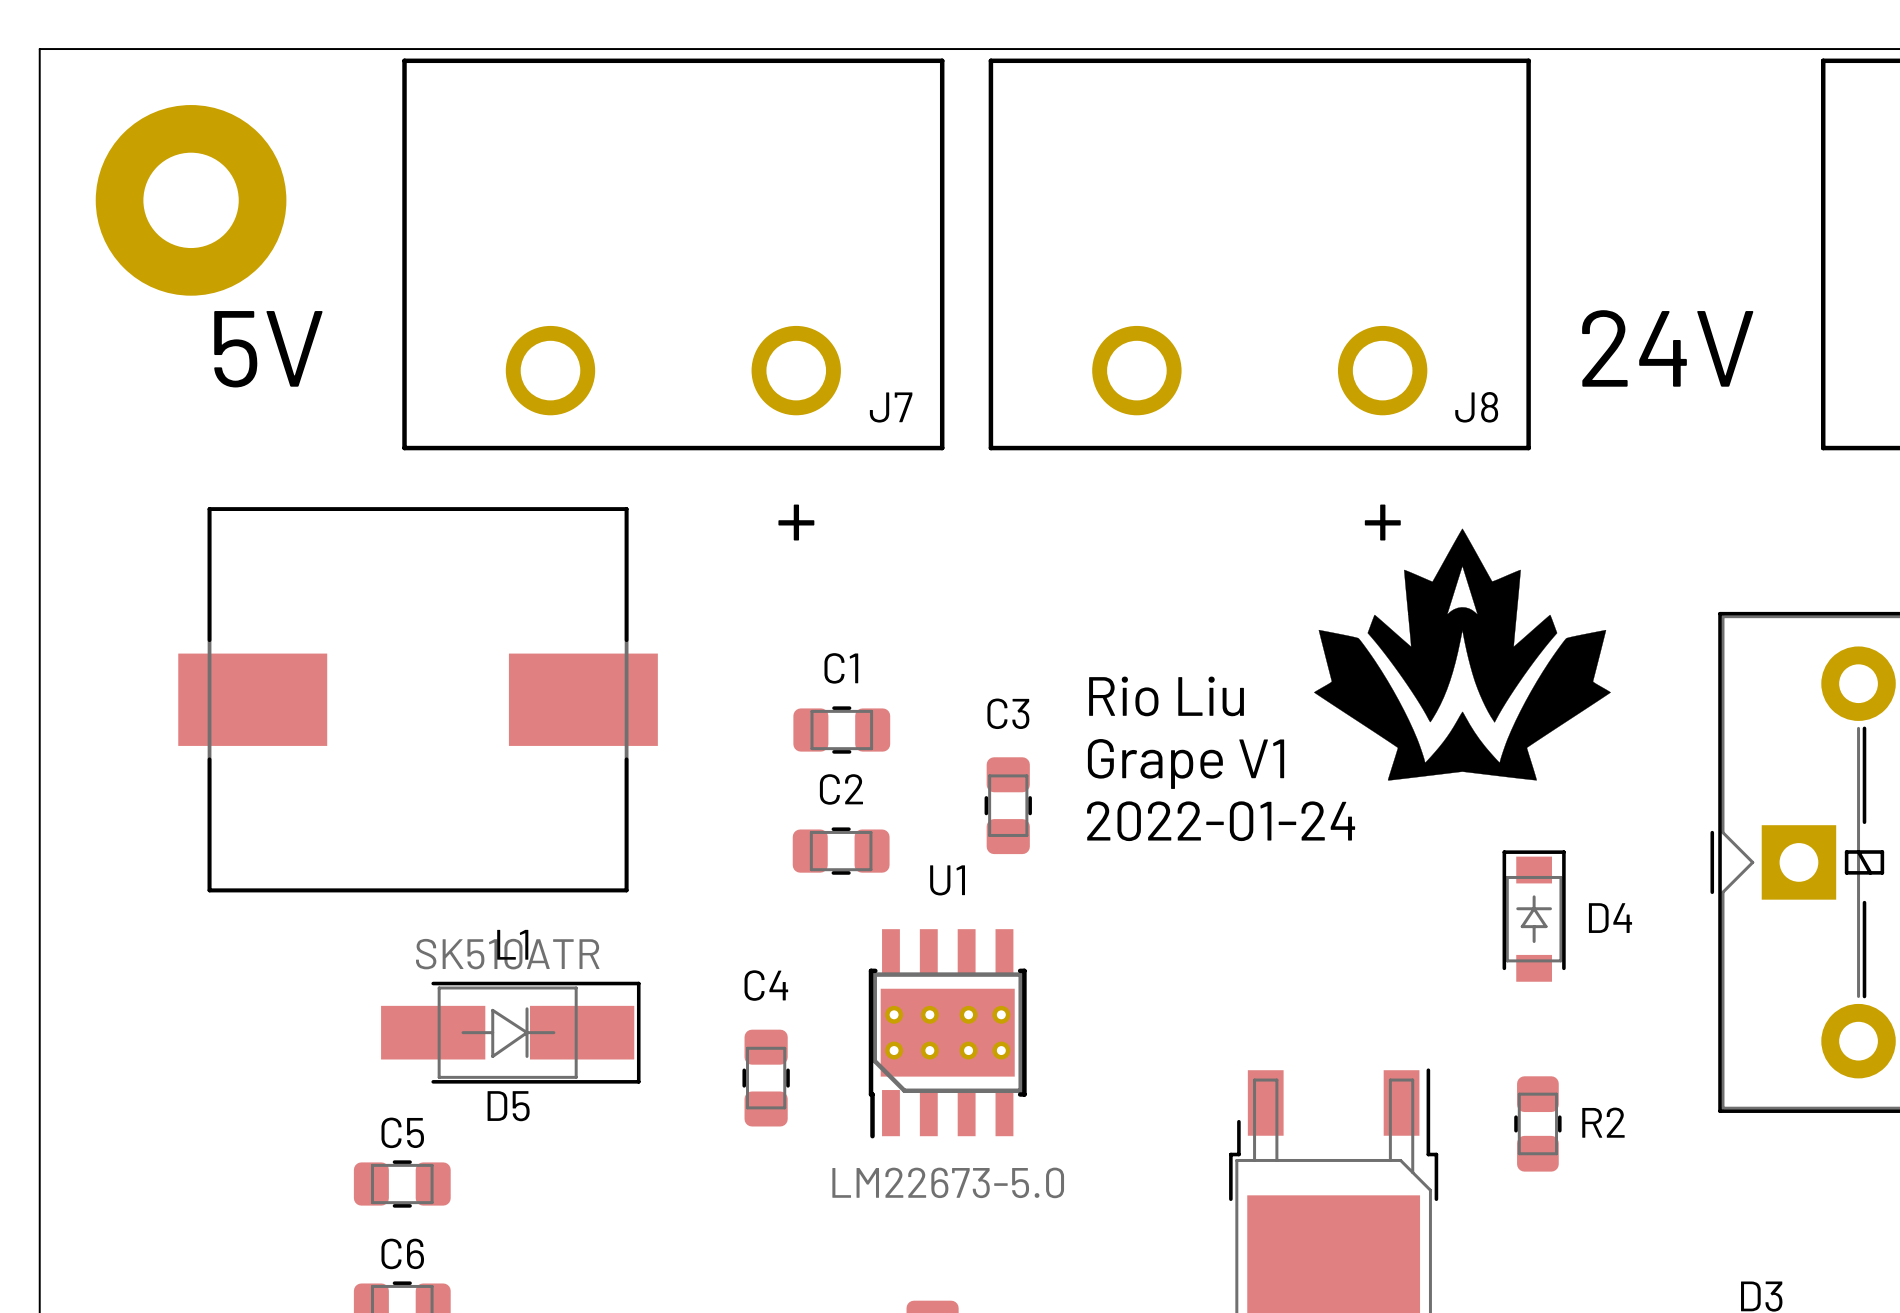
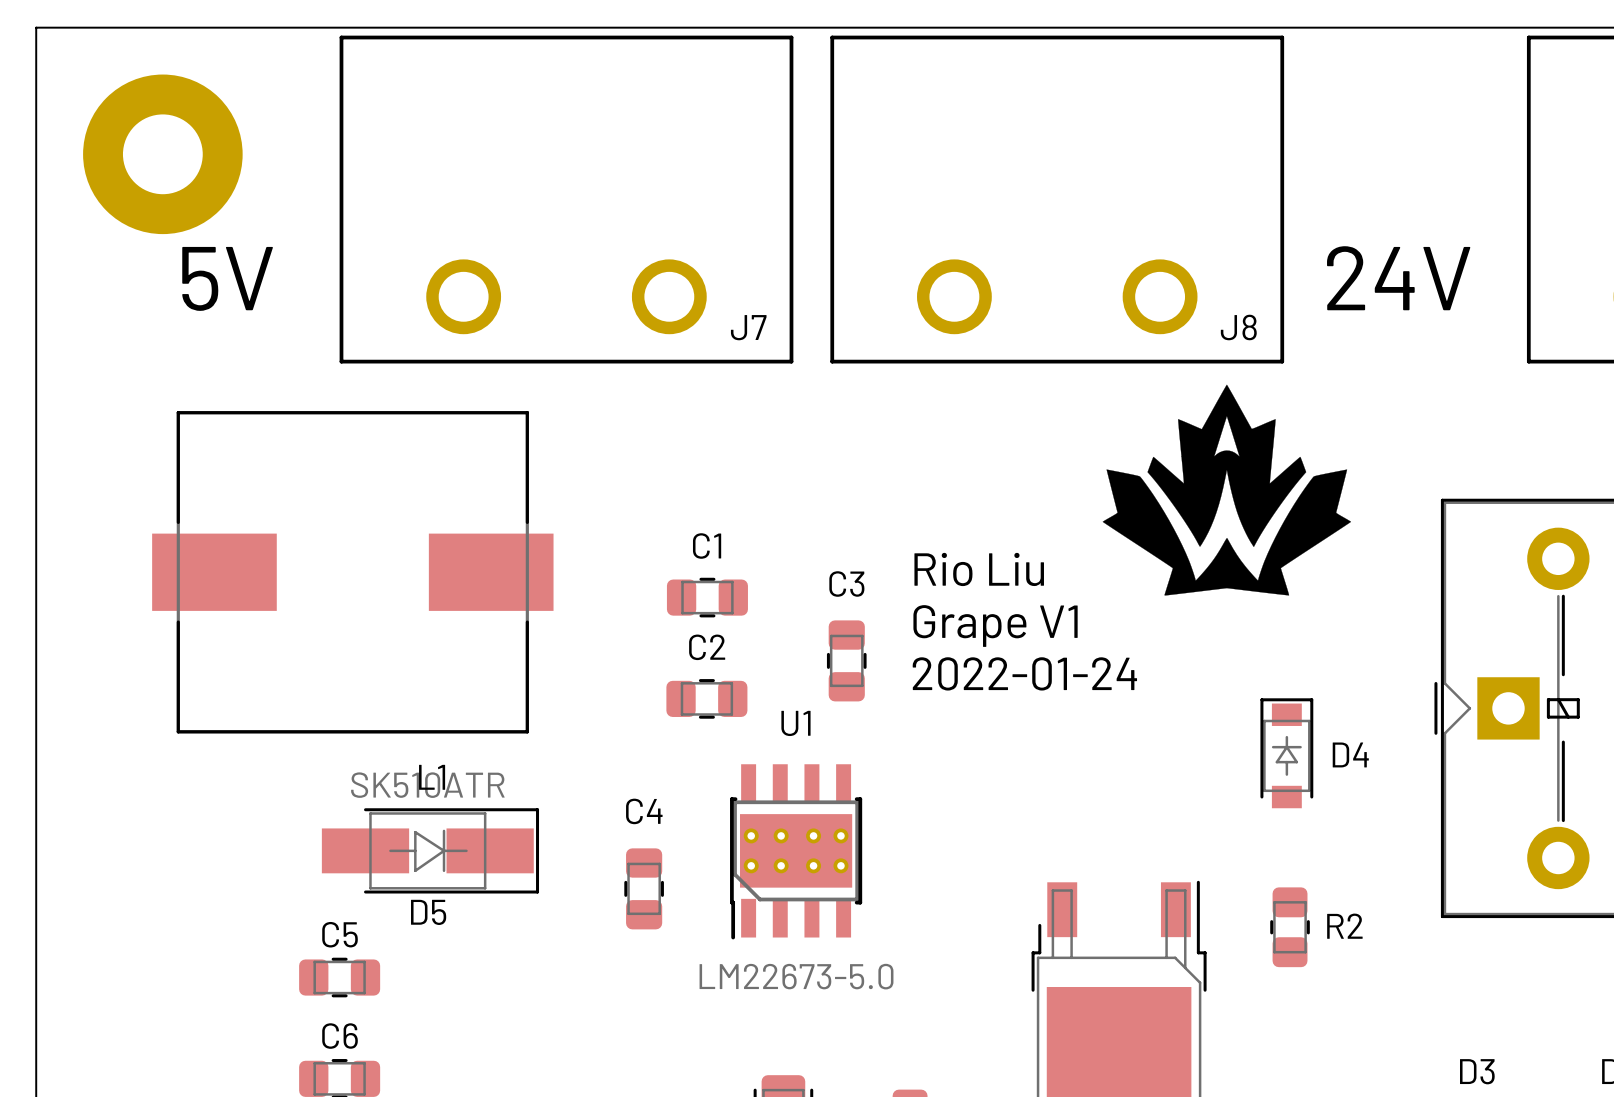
text: + (796, 522) -> none
text: + (1382, 522) -> none
drawing position: (1462, 654) -> (1226, 490)

